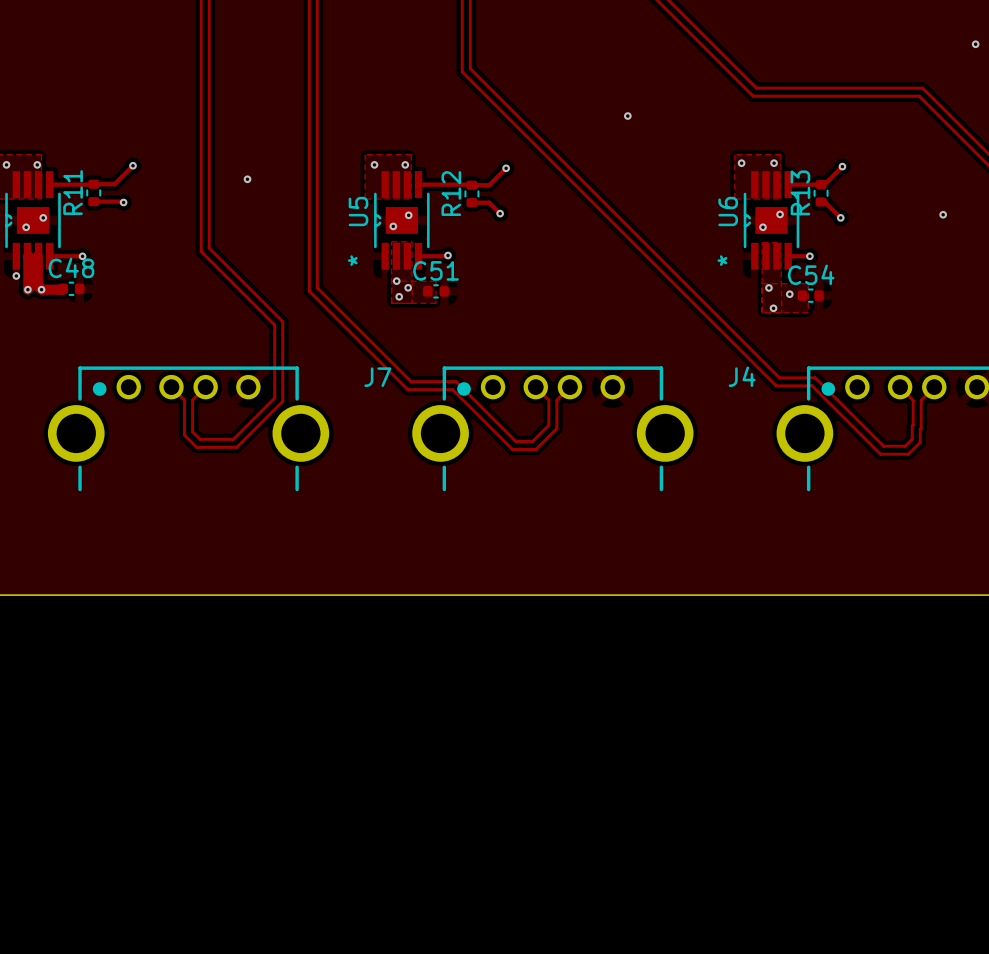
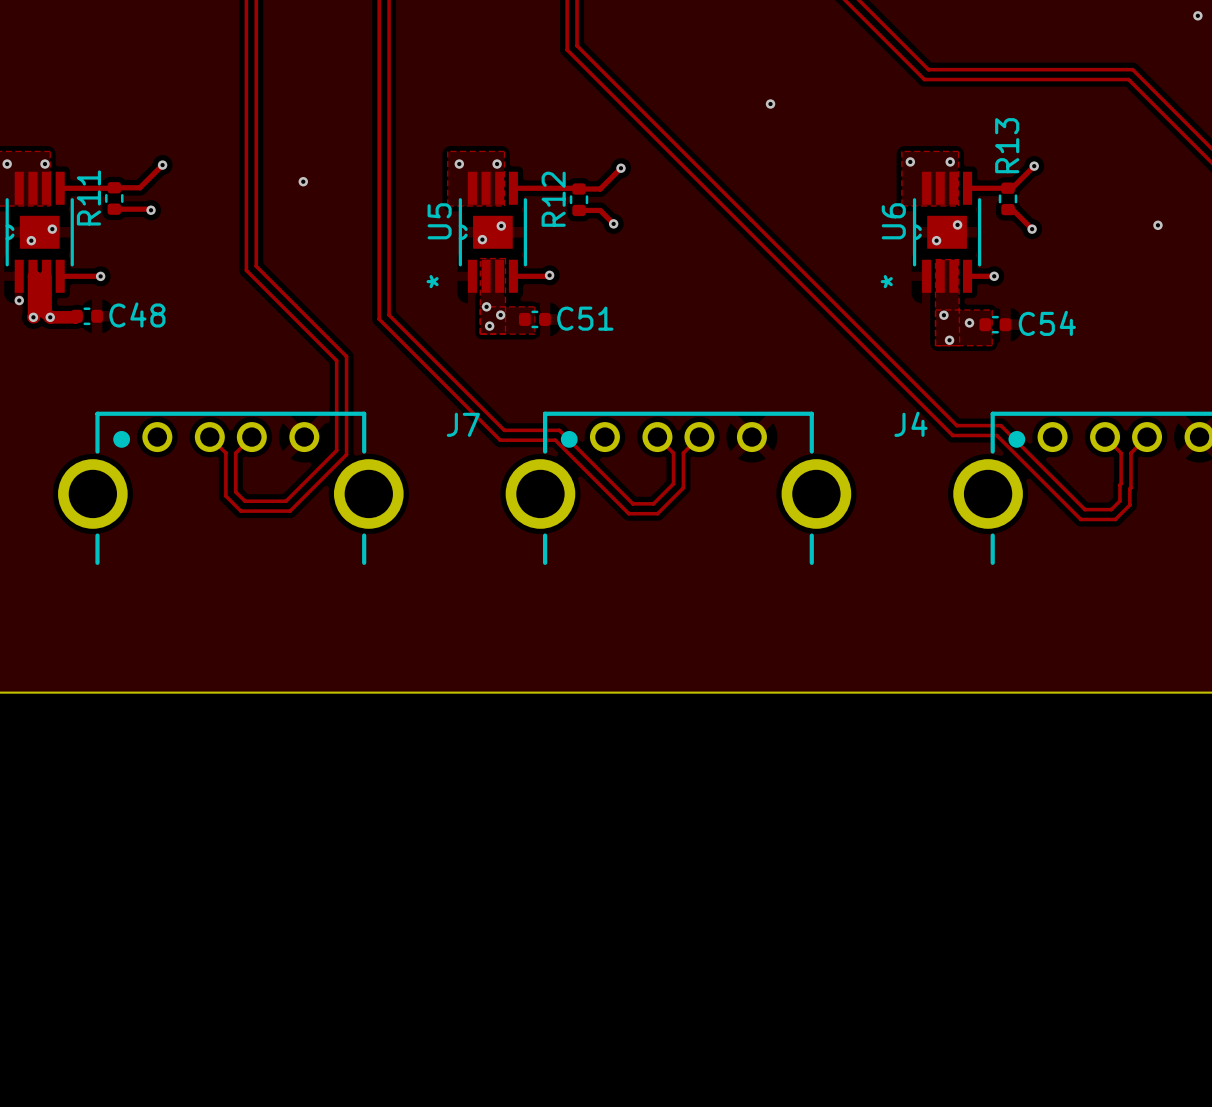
R13 name position: R13 (800, 192) -> R13 (1007, 145)
C48 name position: C48 (71, 267) -> C48 (137, 315)
C51 name position: C51 (436, 270) -> C51 (585, 318)
C54 name position: C54 (811, 274) -> C54 (1047, 323)

